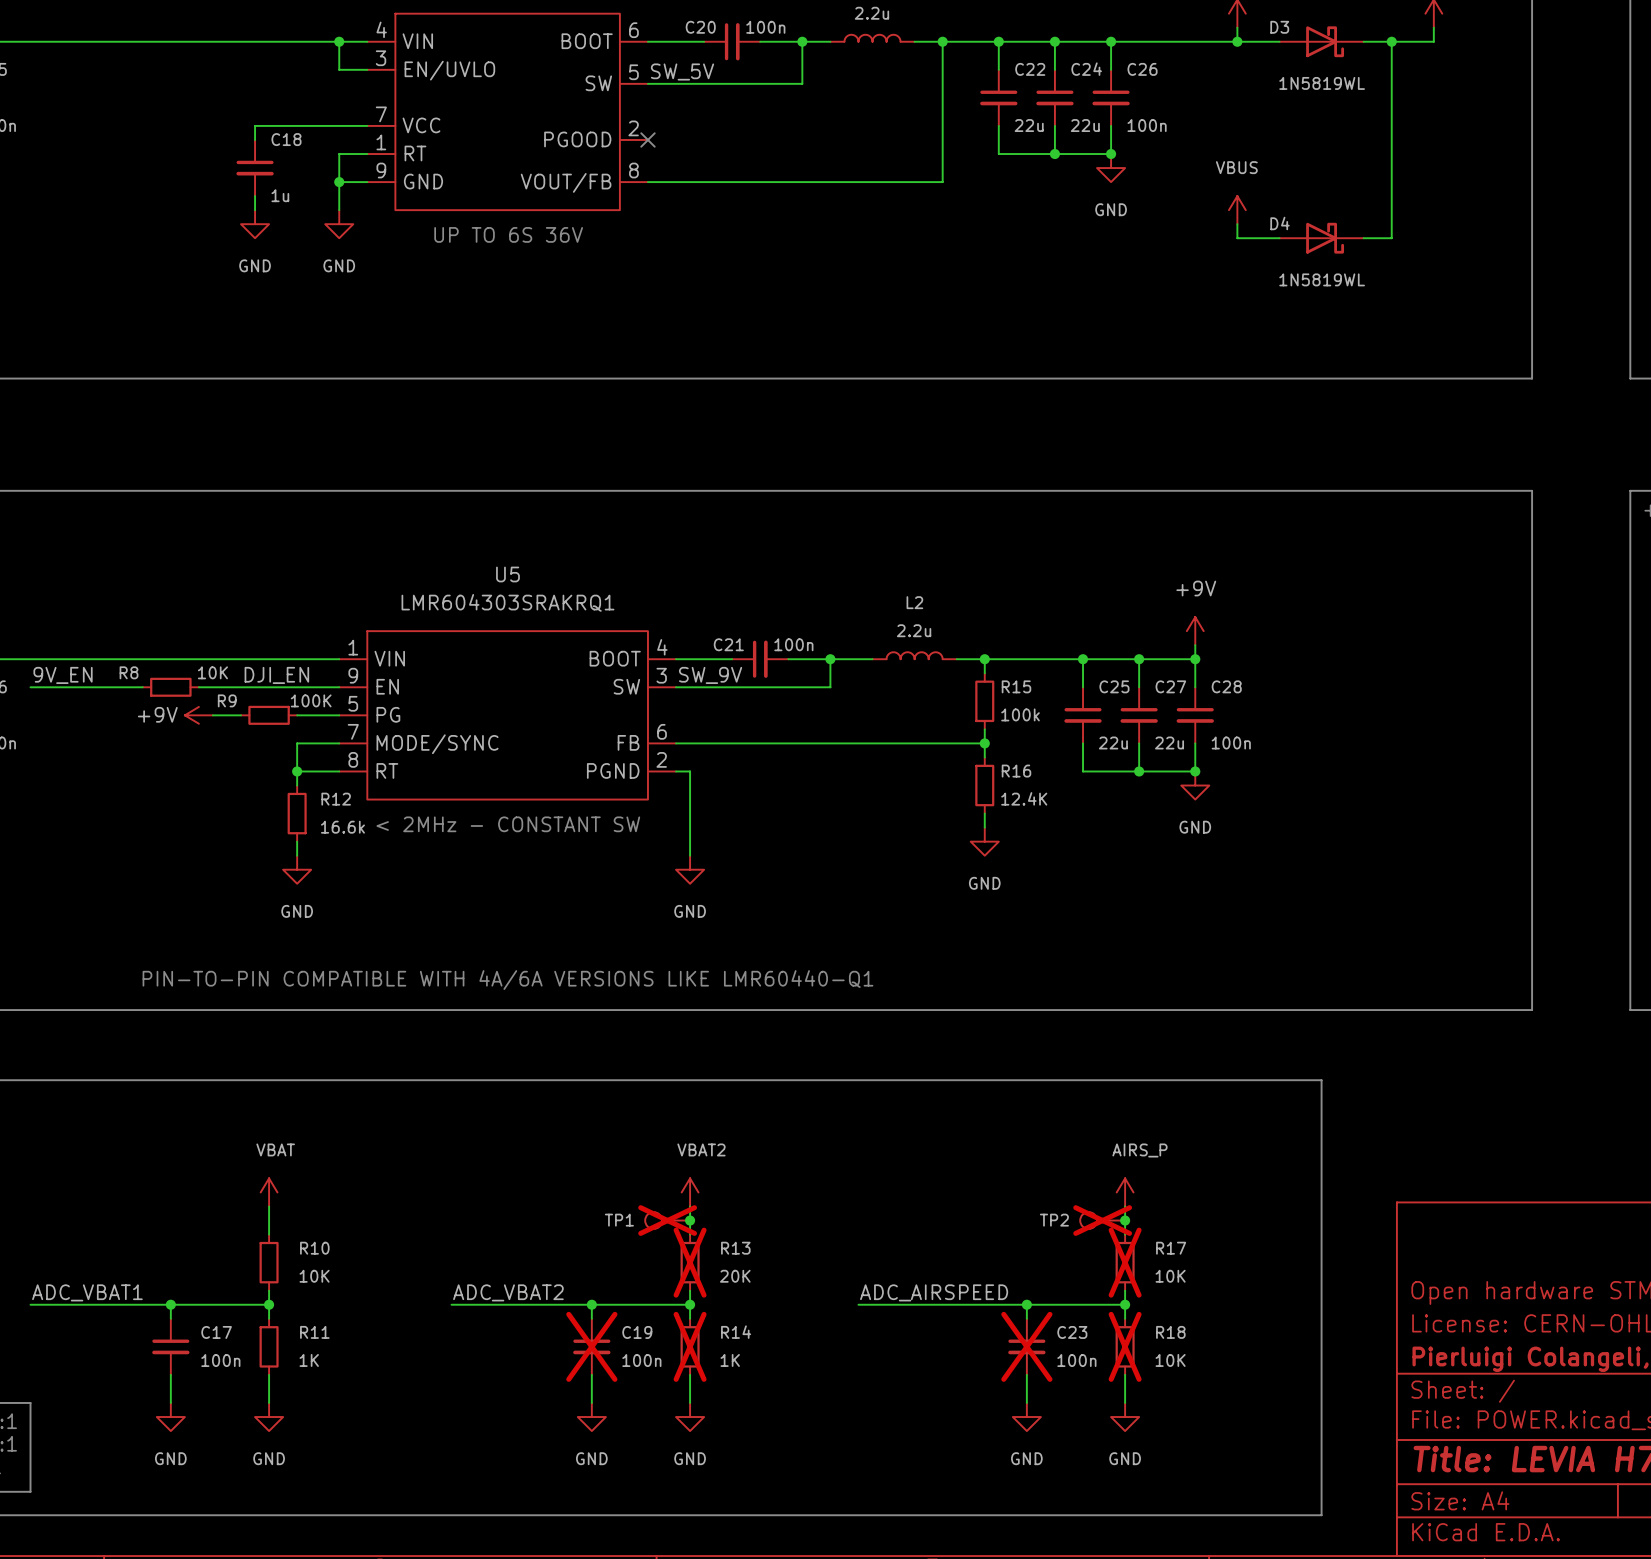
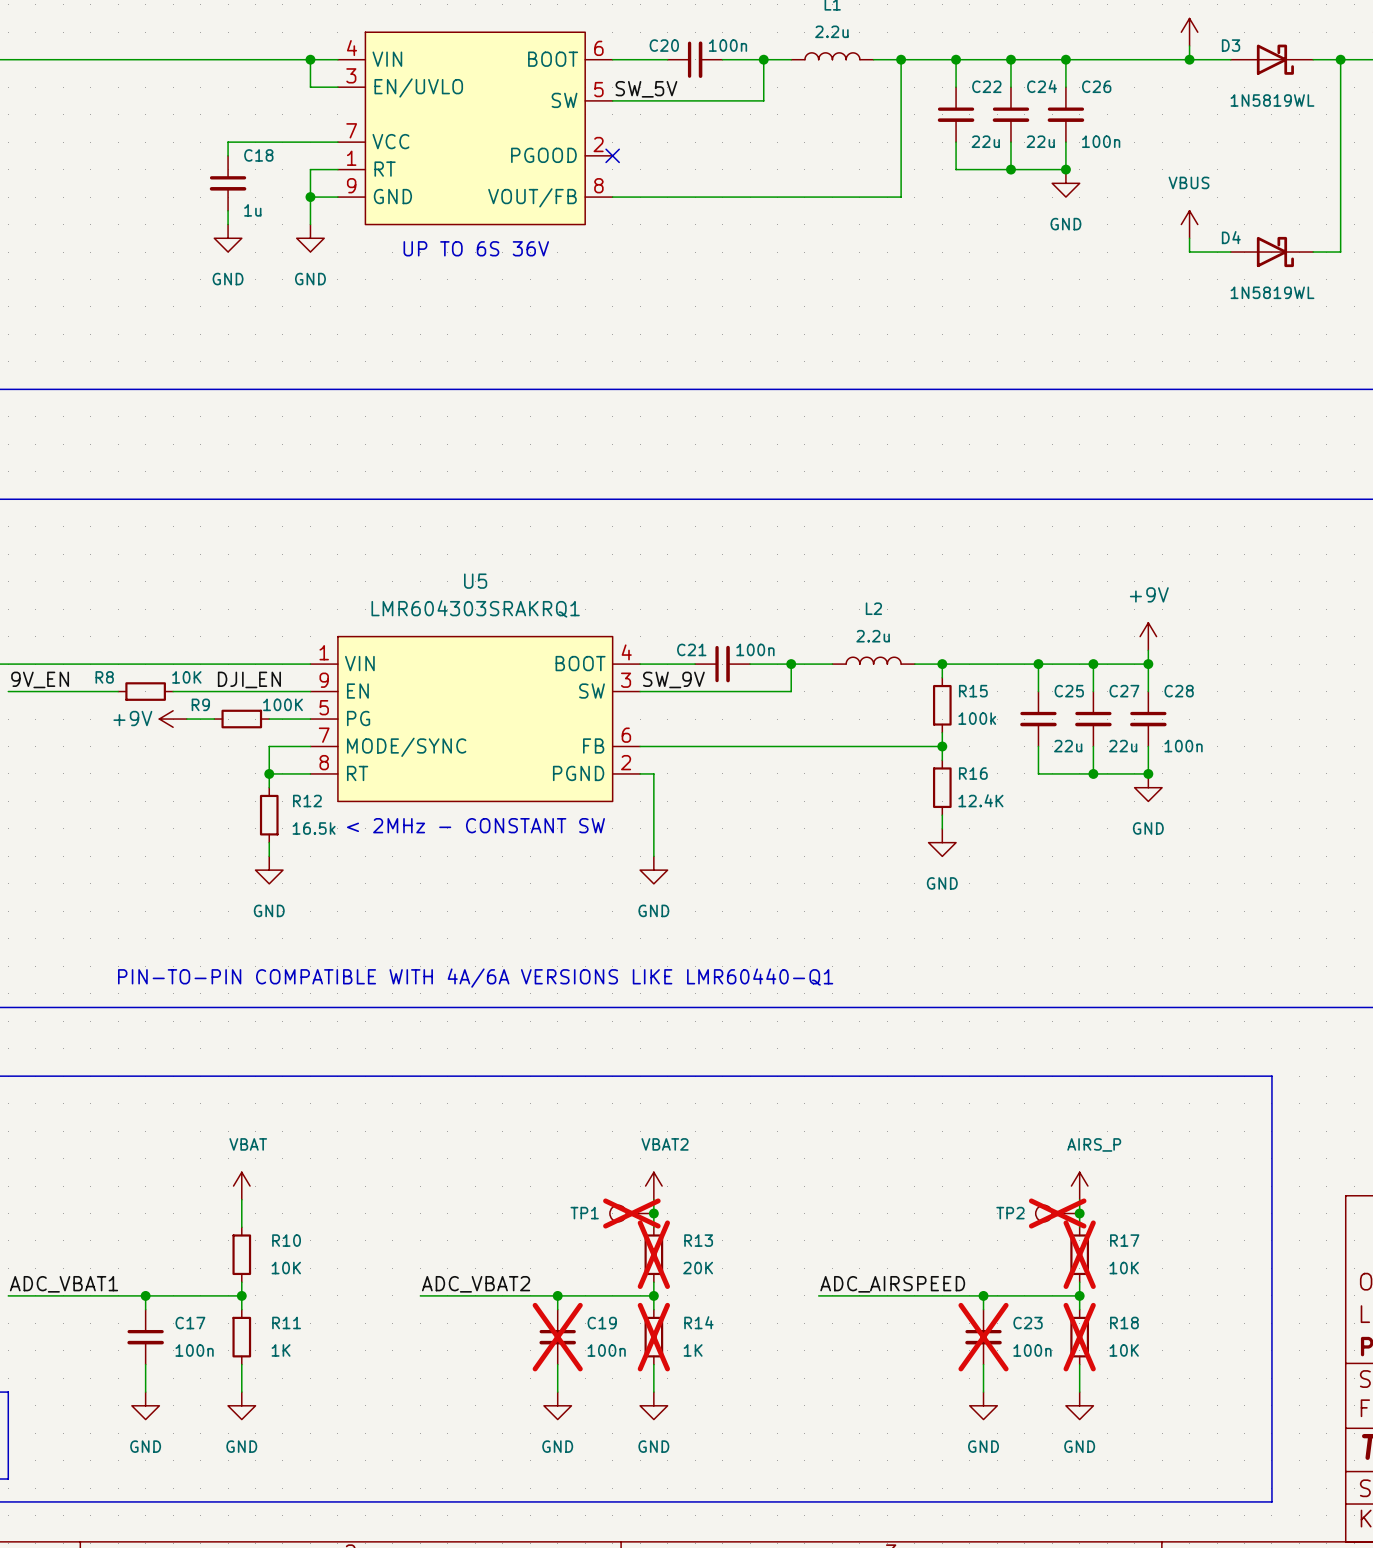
R12 value: 16.6k (342, 827) -> 16.5k (314, 828)

